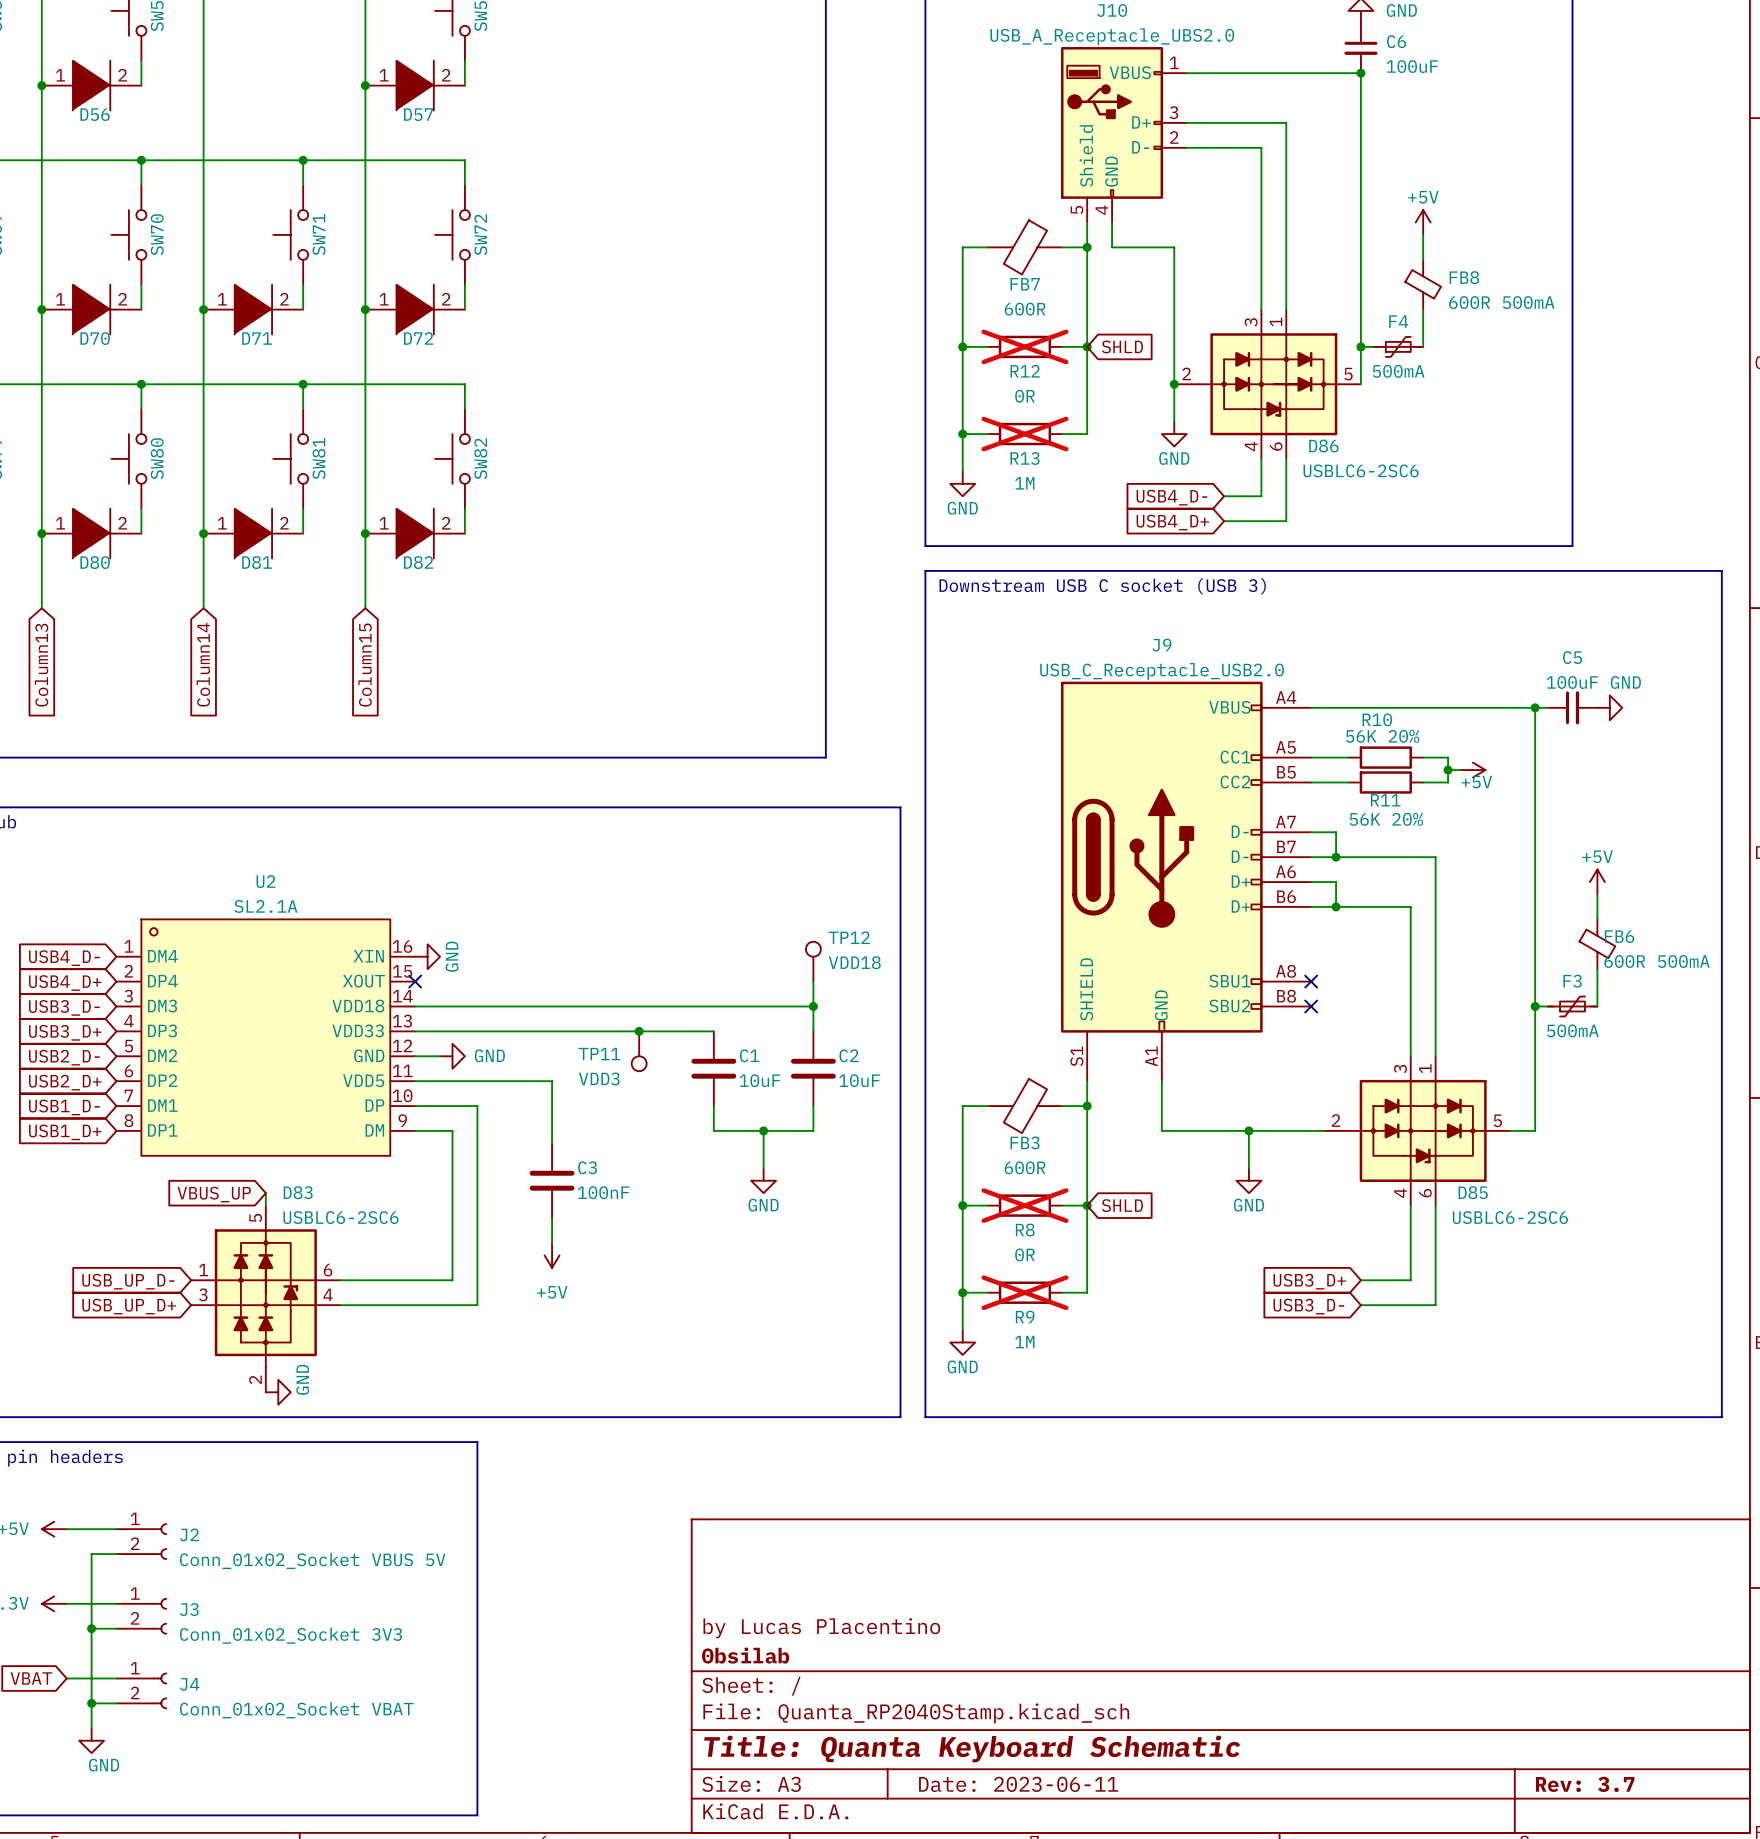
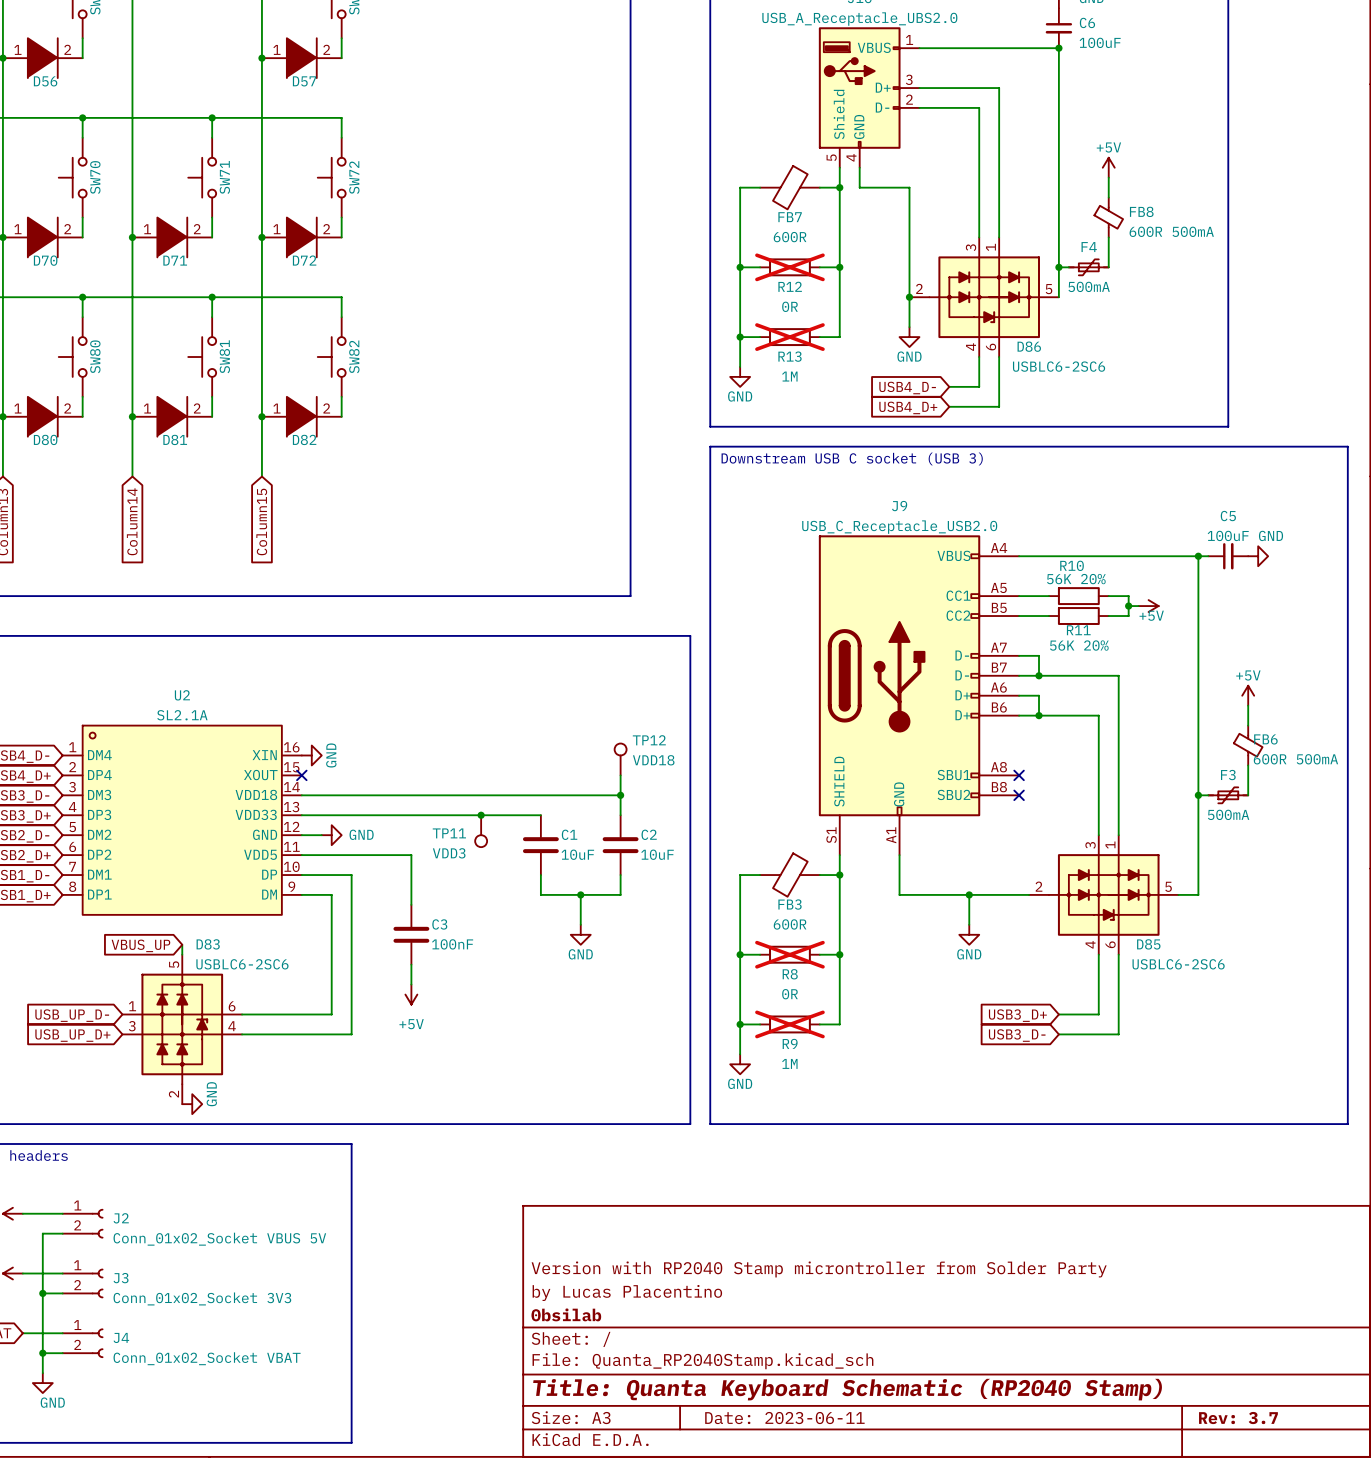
global label: SHLD (1122, 346) -> none
global label: SHLD (1122, 1205) -> none
title block: none -> Version with RP2040 Stamp microntroller from Solder Party (819, 1269)
title block: Title: Quanta Keyboard Schematic (972, 1749) -> Title: Quanta Keyboard Schematic (RP2040 Stamp) (847, 1389)

